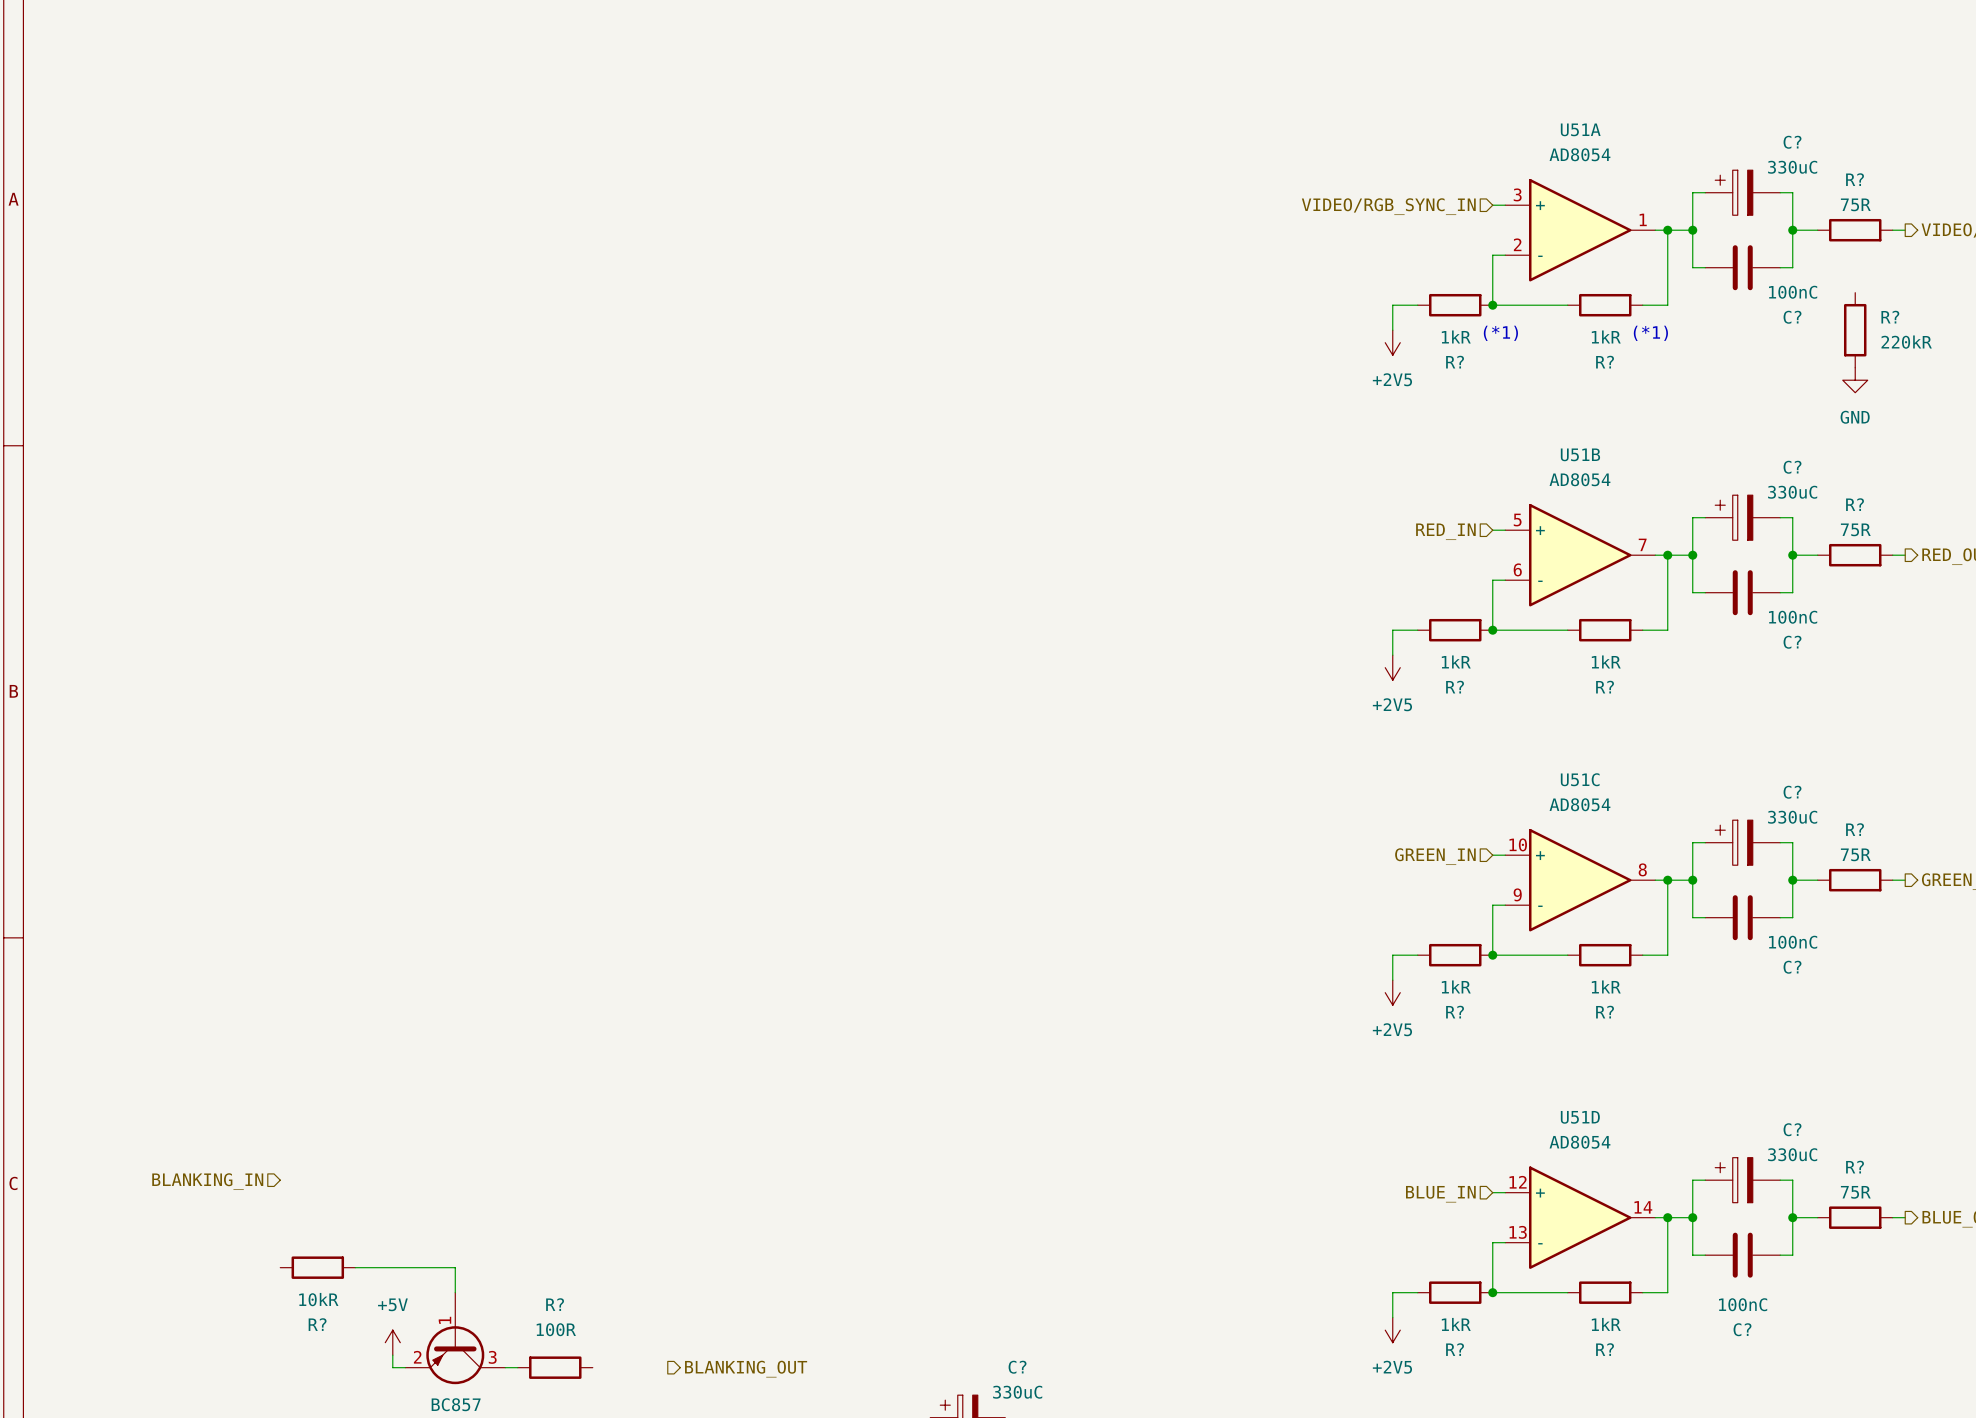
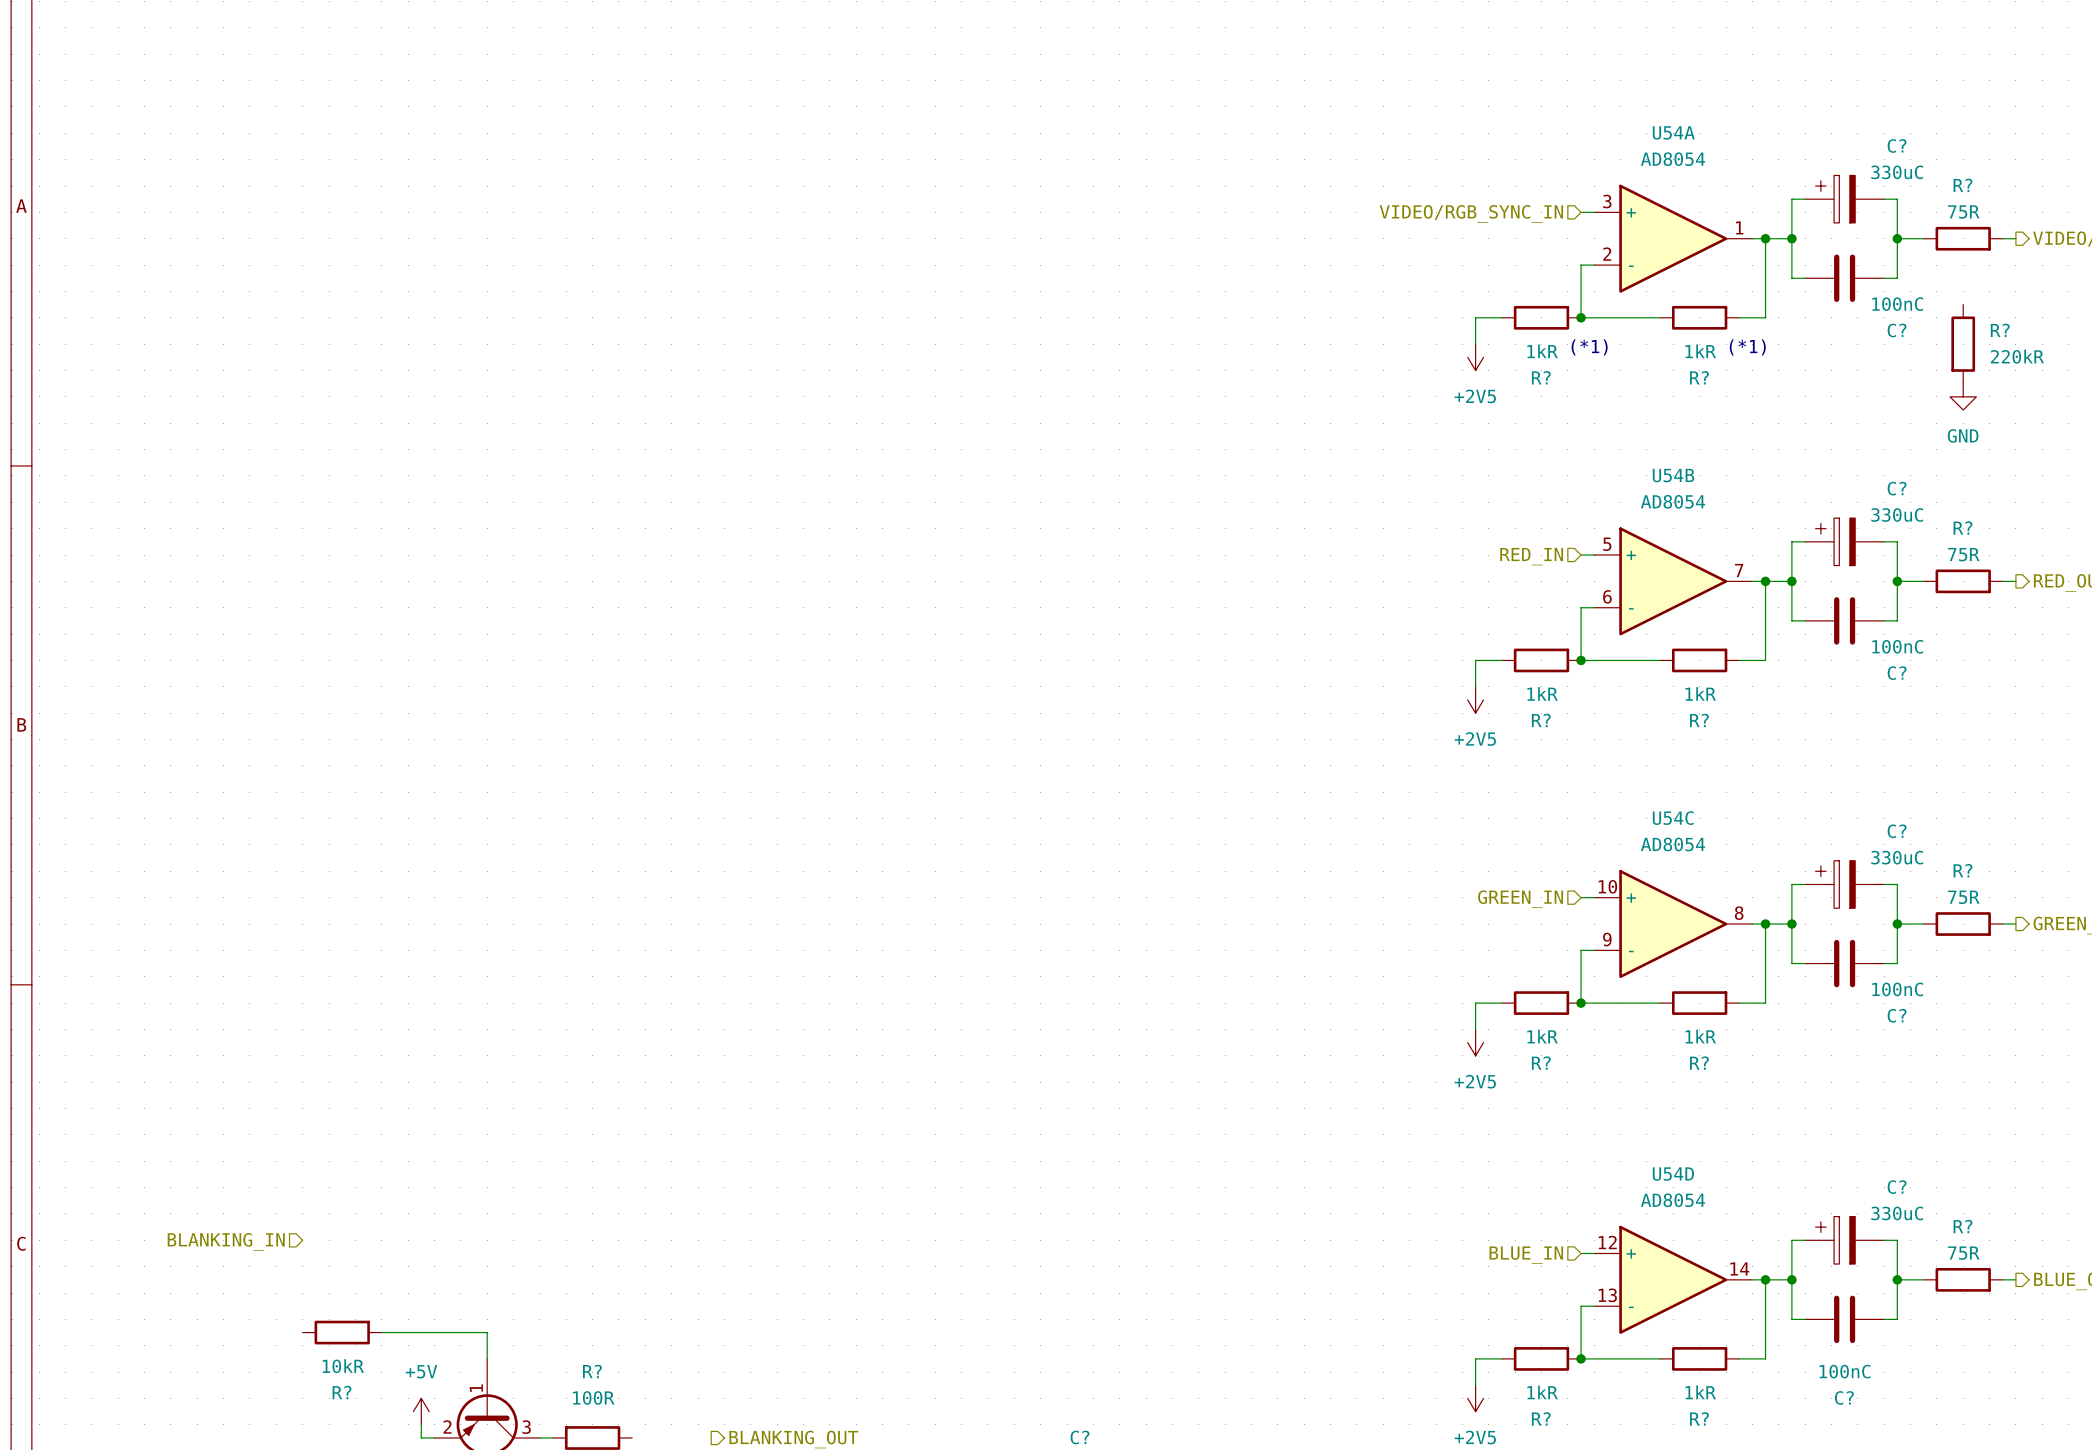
U51A name: U51A (1580, 129) -> U54A (1673, 132)
U51B name: U51B (1580, 454) -> U54B (1673, 475)
U51C name: U51C (1580, 779) -> U54C (1673, 818)
U51D name: U51D (1580, 1117) -> U54D (1673, 1174)

